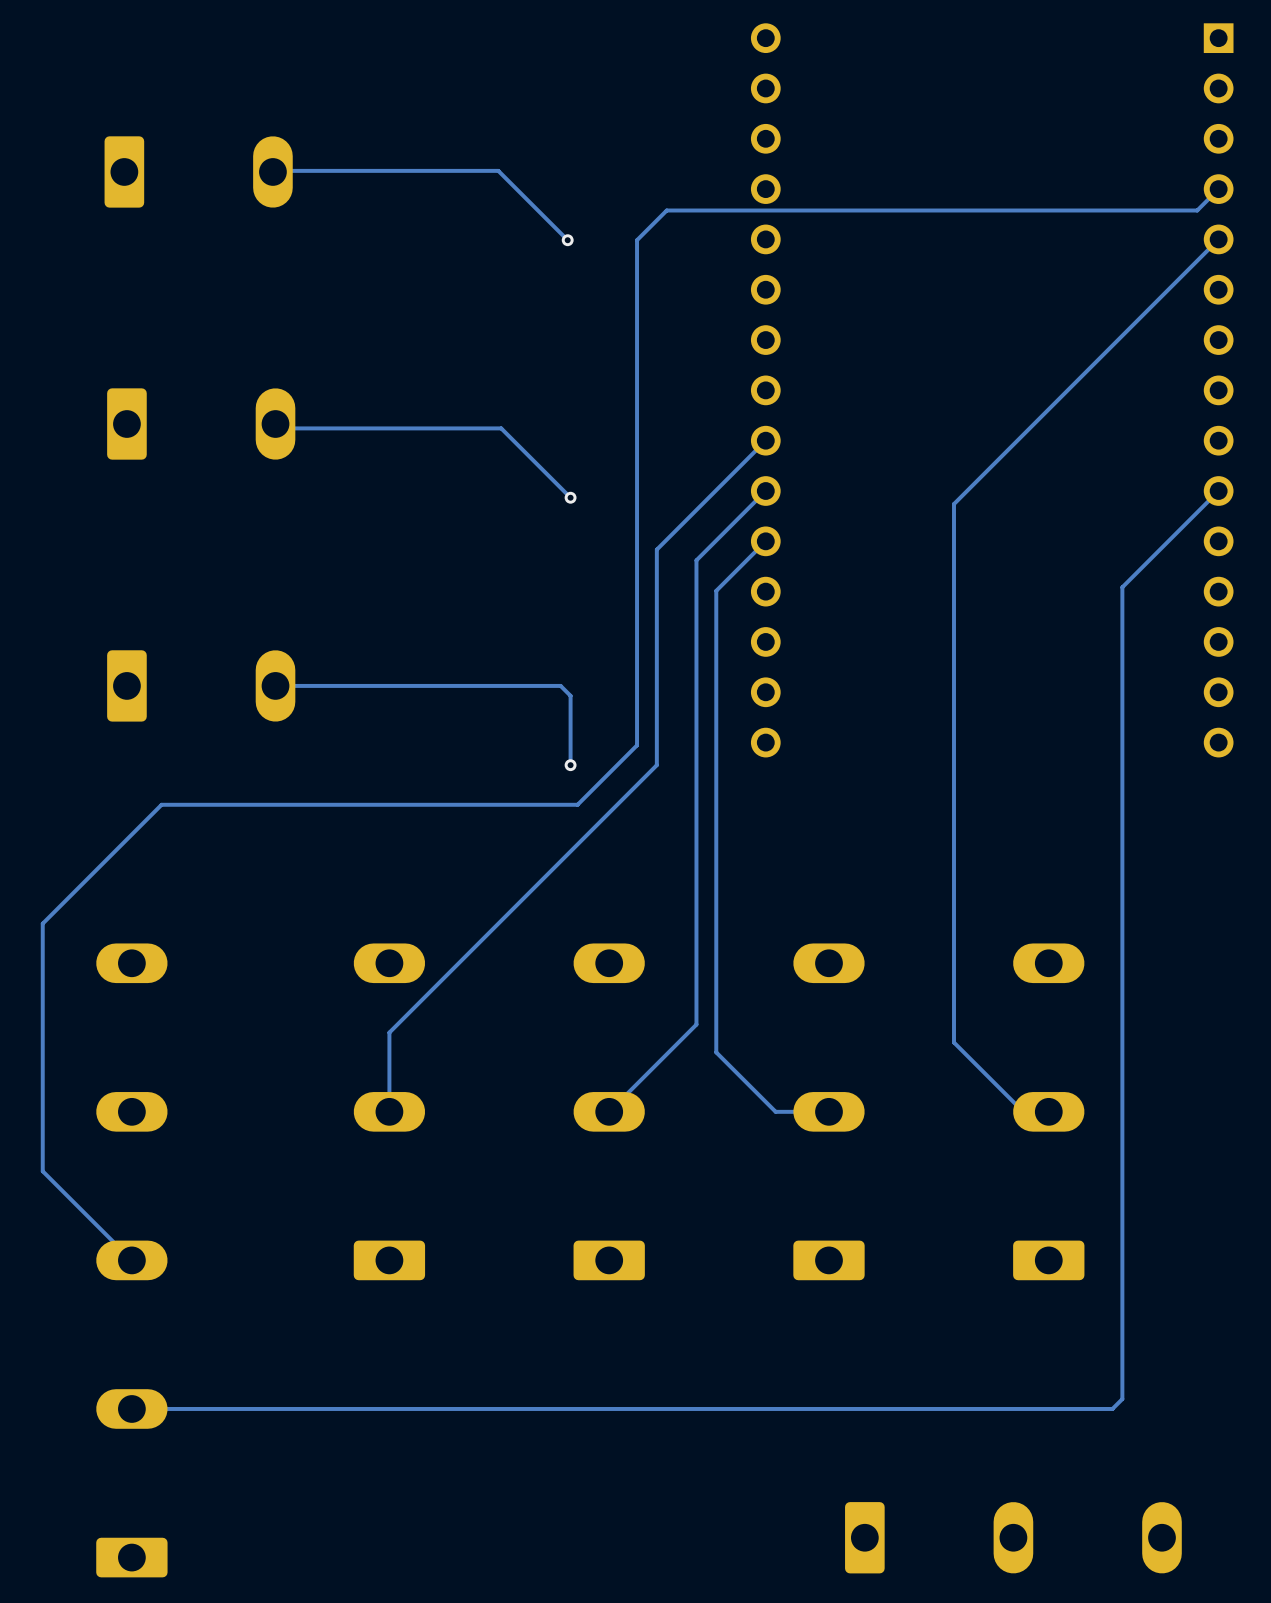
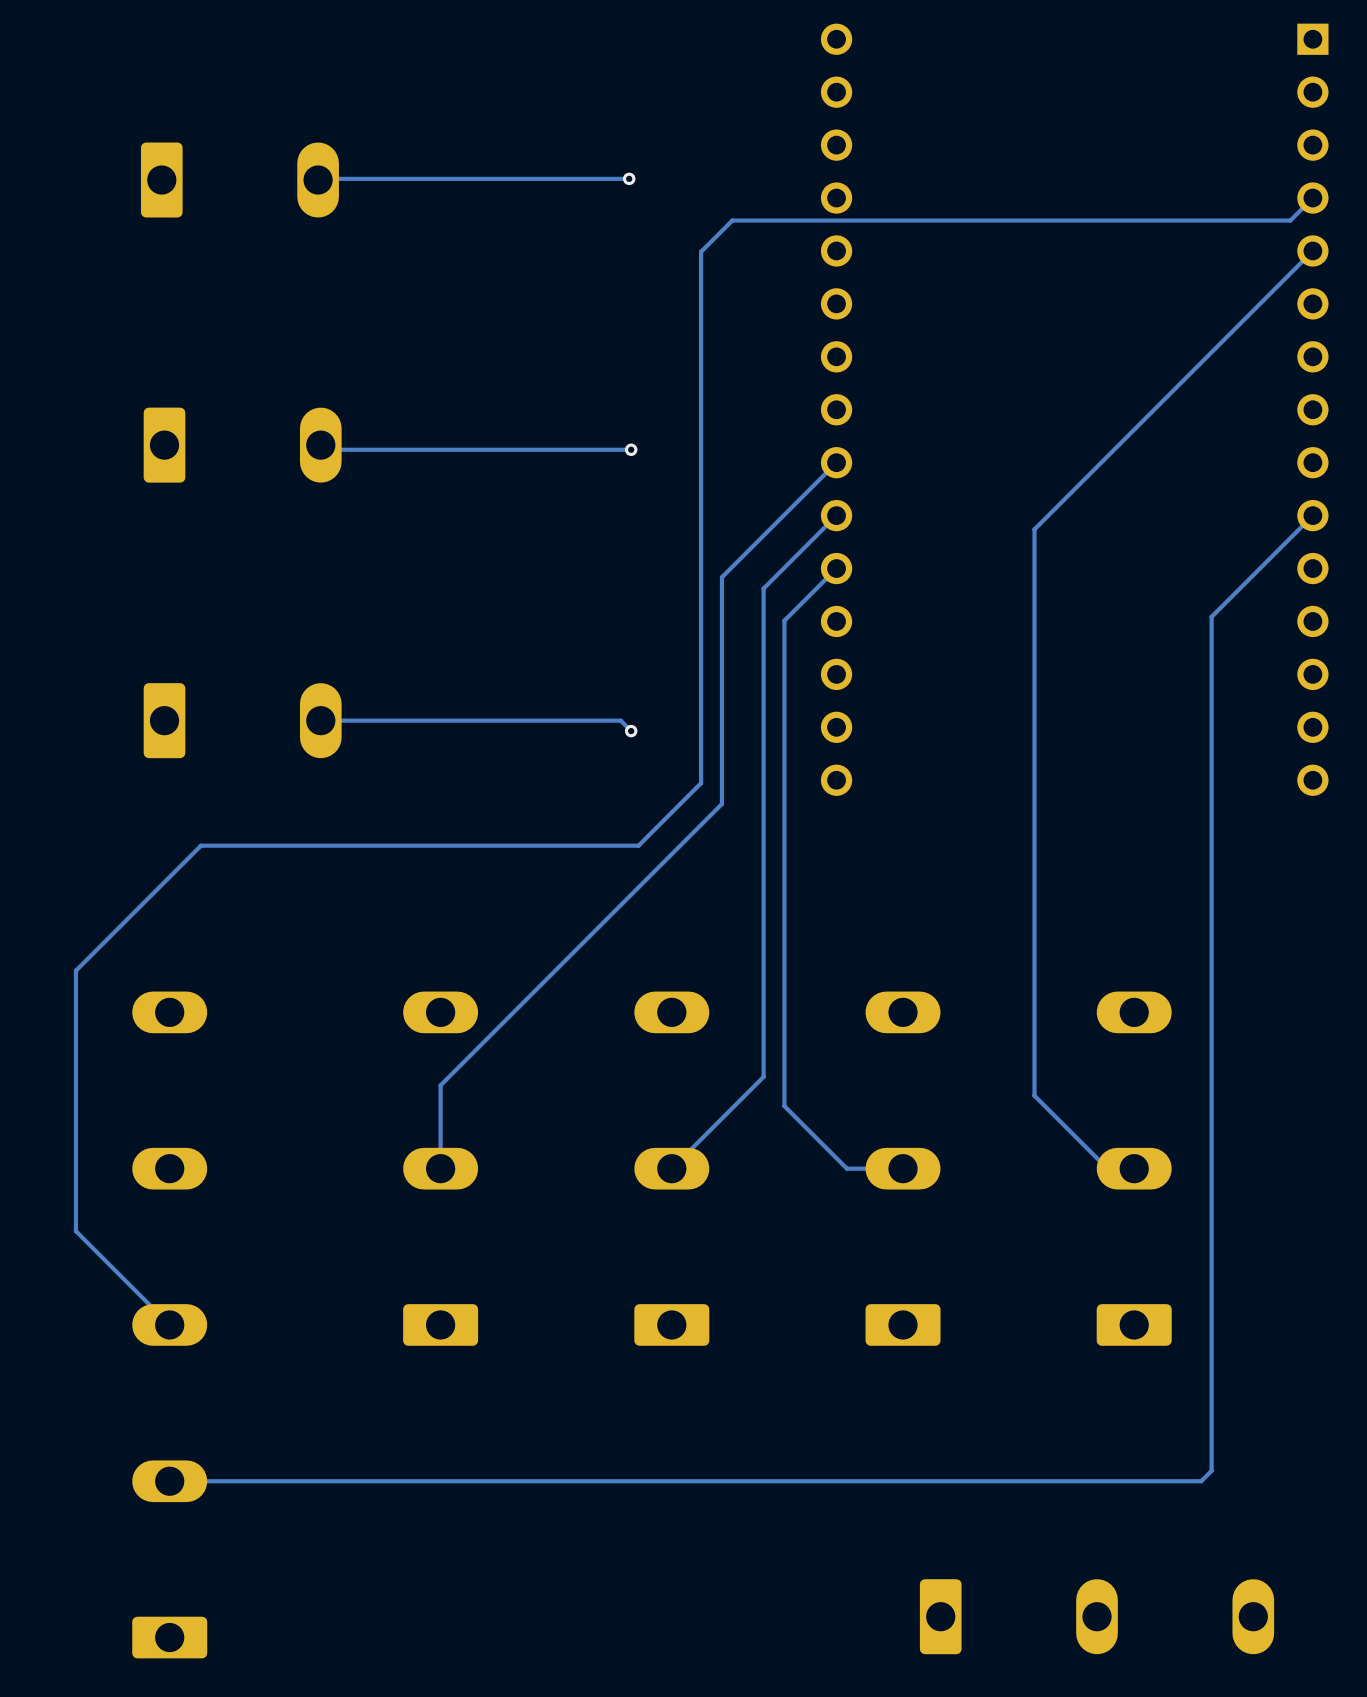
track: (498, 170) (567, 240) -> (555, 178) (629, 178)
via position: (567, 240) -> (629, 178)
track: (501, 428) (570, 497) -> (558, 449) (631, 449)
via position: (570, 497) -> (631, 449)
track: (570, 695) (570, 765) -> none
via position: (570, 765) -> (631, 731)

